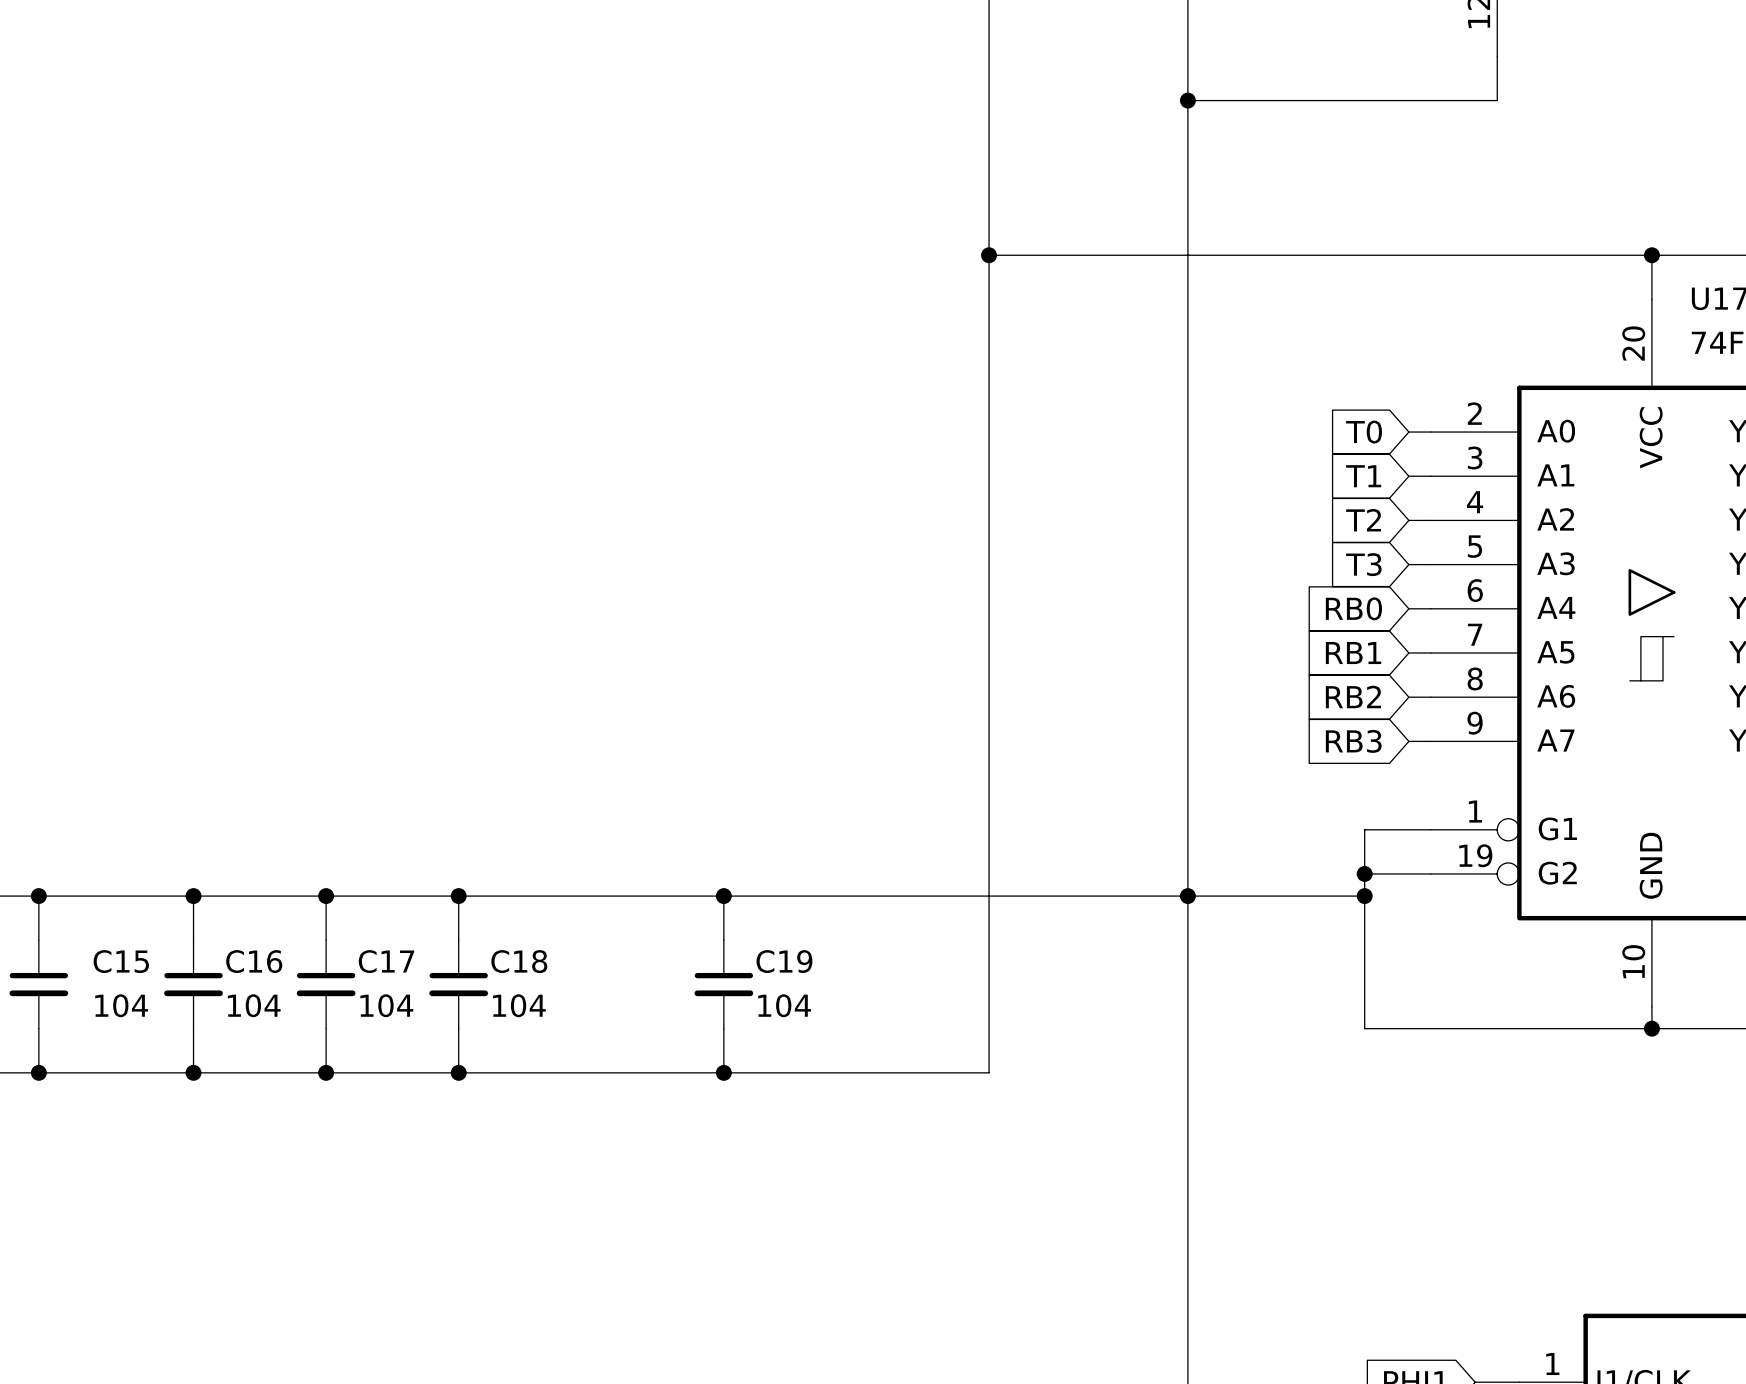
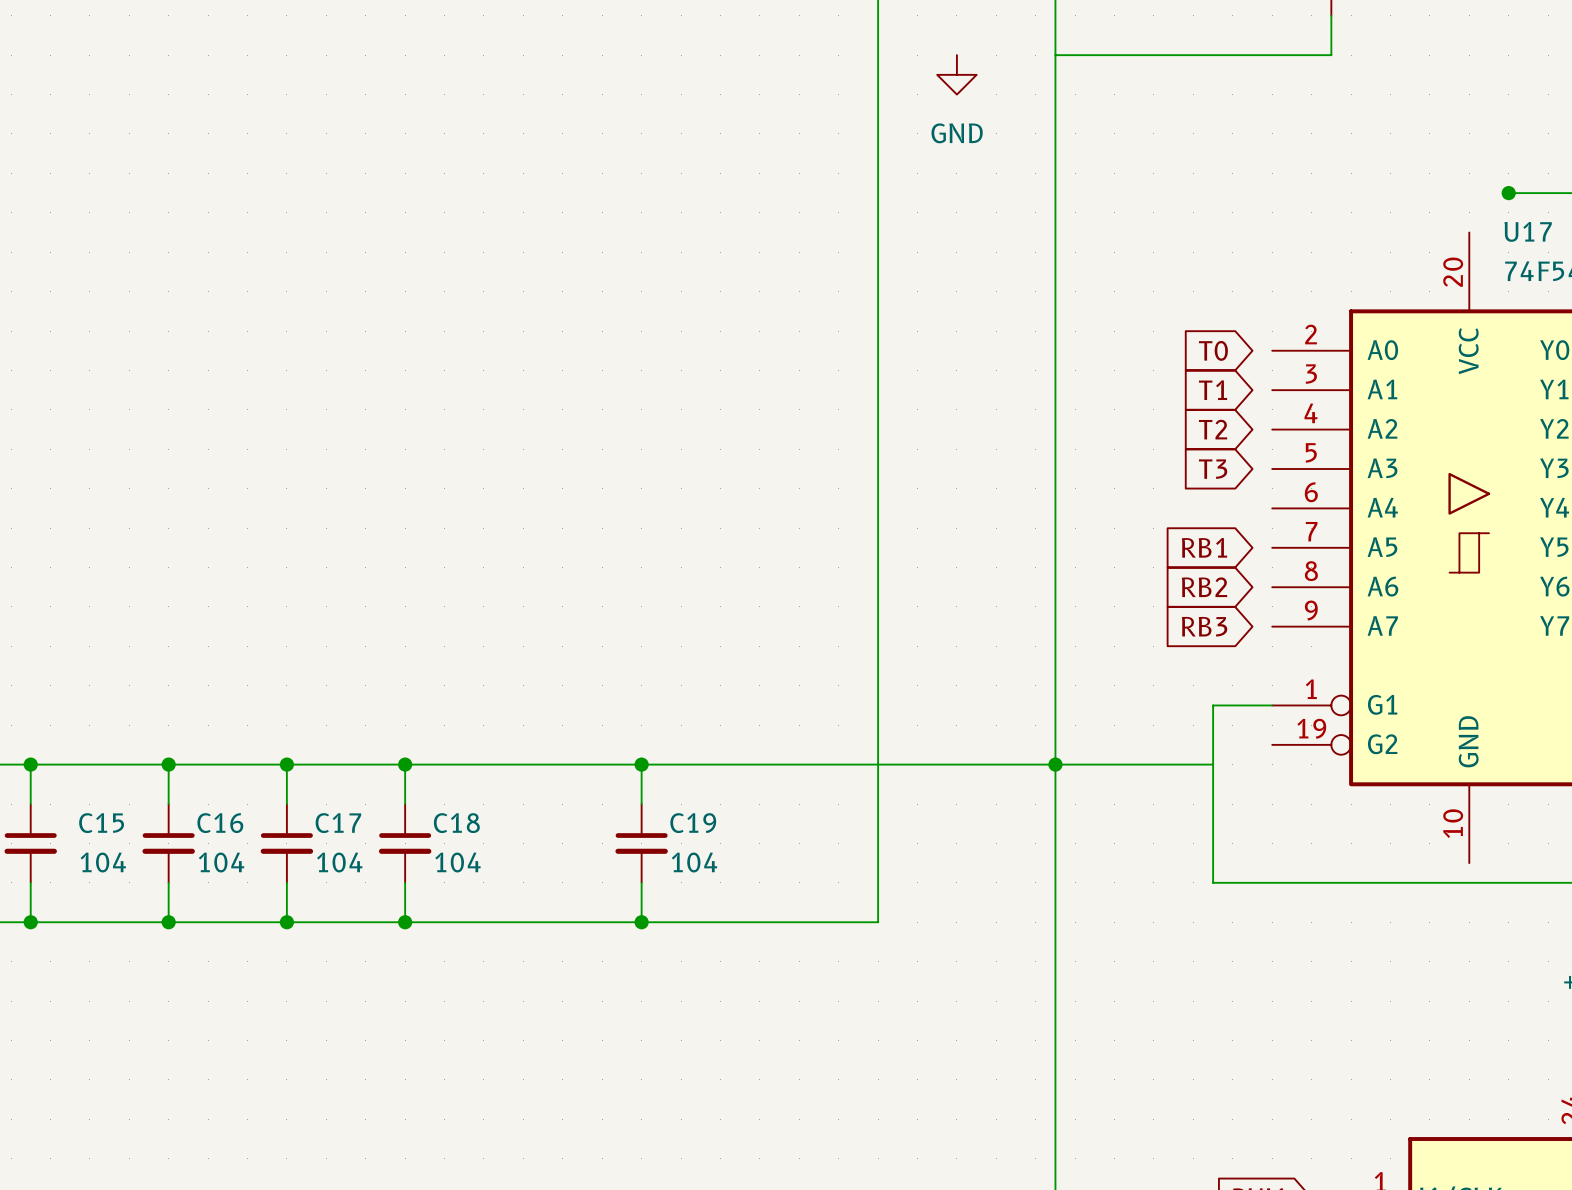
junction: (1187, 100) -> none
power symbol: none -> GND (956, 74)
wire: (989, 255) (1696, 255) -> none
junction: (989, 255) -> none
wire: (1651, 255) (1651, 299) -> none
junction position: (1651, 255) -> (1508, 193)
wire: (1408, 432) (1430, 432) -> none
wire: (1408, 476) (1430, 476) -> none
wire: (1408, 520) (1430, 520) -> none
wire: (1408, 564) (1430, 564) -> none
global label: RB0 (1353, 608) -> none
wire: (1408, 608) (1430, 608) -> none
wire: (1408, 653) (1430, 653) -> none
wire: (1408, 697) (1430, 697) -> none
wire: (1408, 741) (1430, 741) -> none
wire: (1364, 873) (1430, 873) -> none
junction: (1364, 873) -> none
junction: (1364, 896) -> none
wire: (1651, 1006) (1651, 1028) -> none
junction: (1651, 1028) -> none

